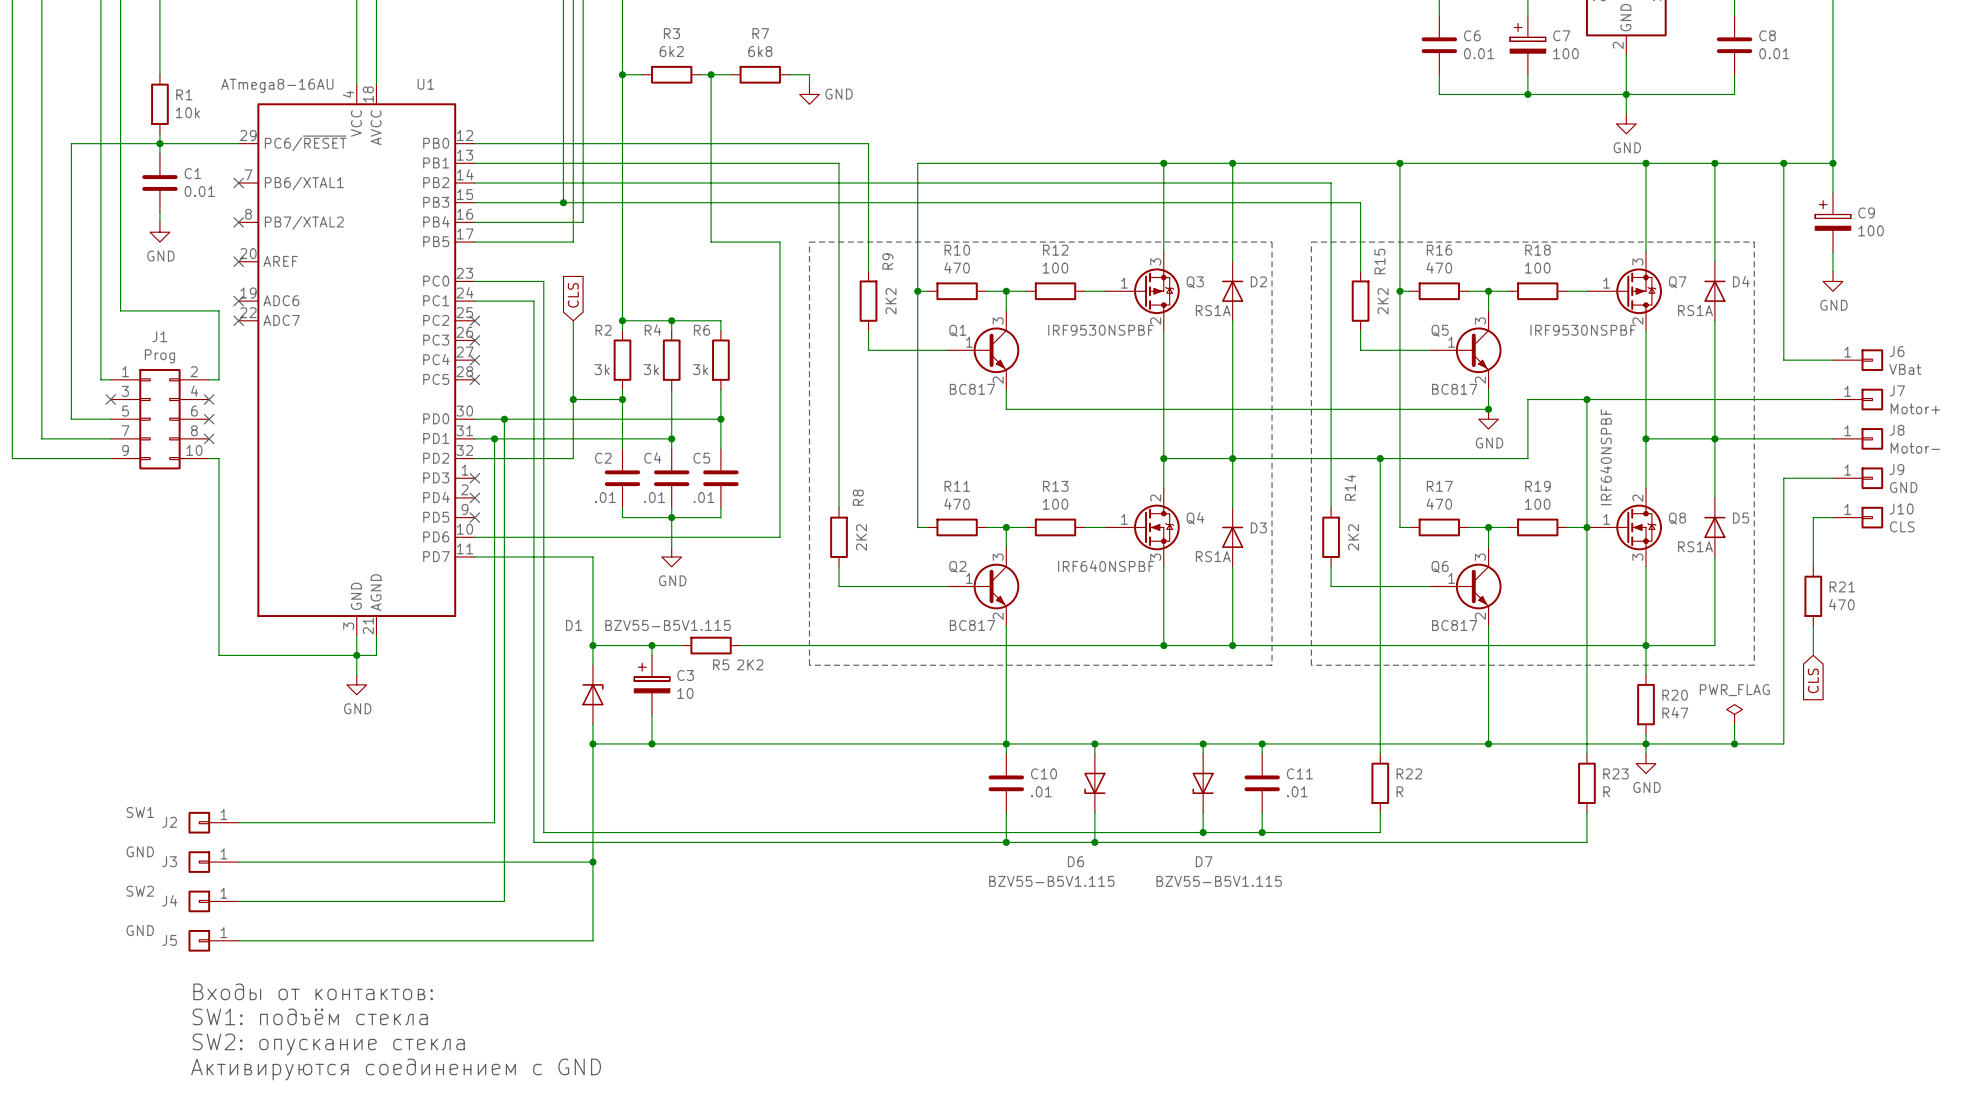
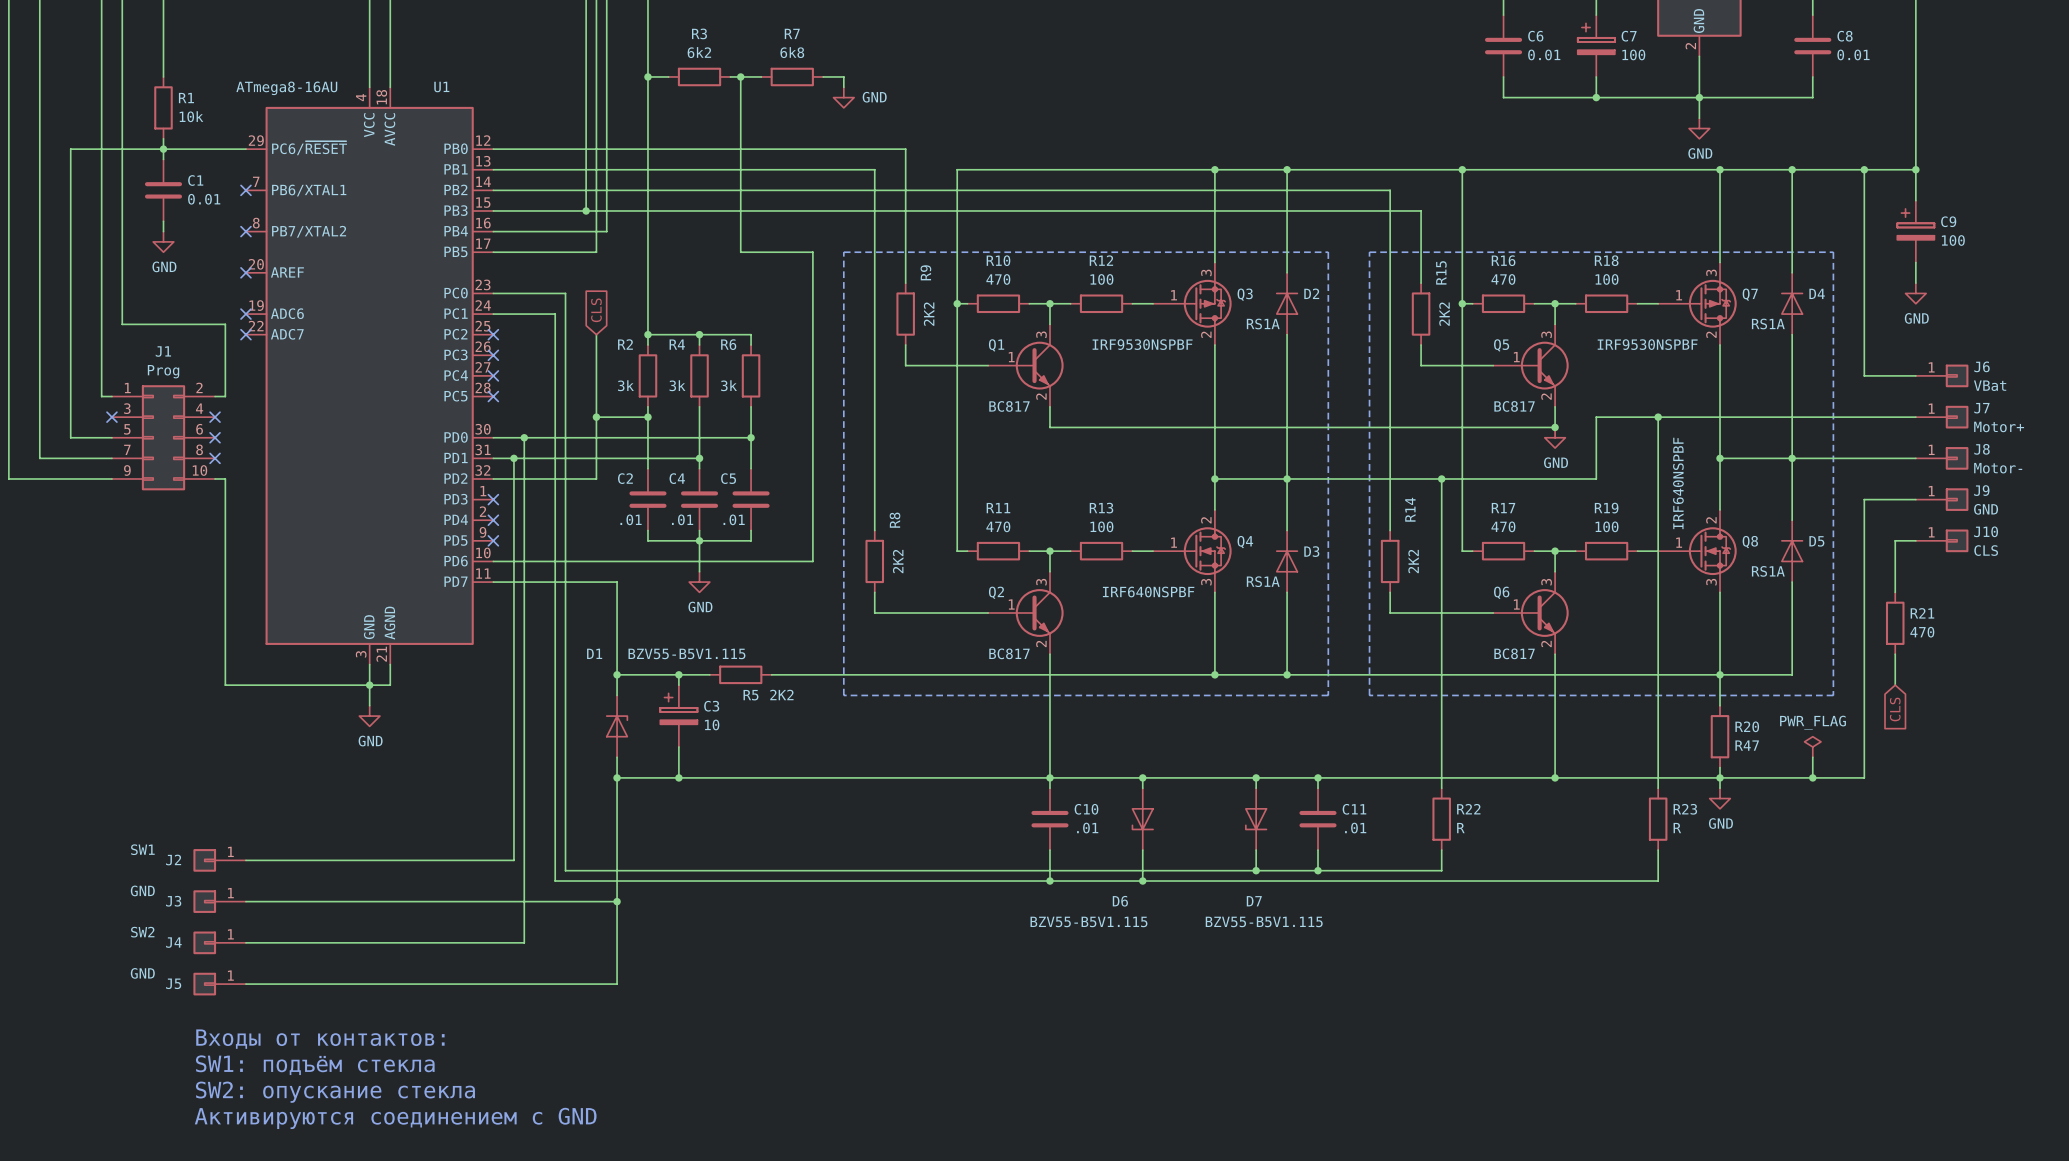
junction: (1586, 527) -> none

